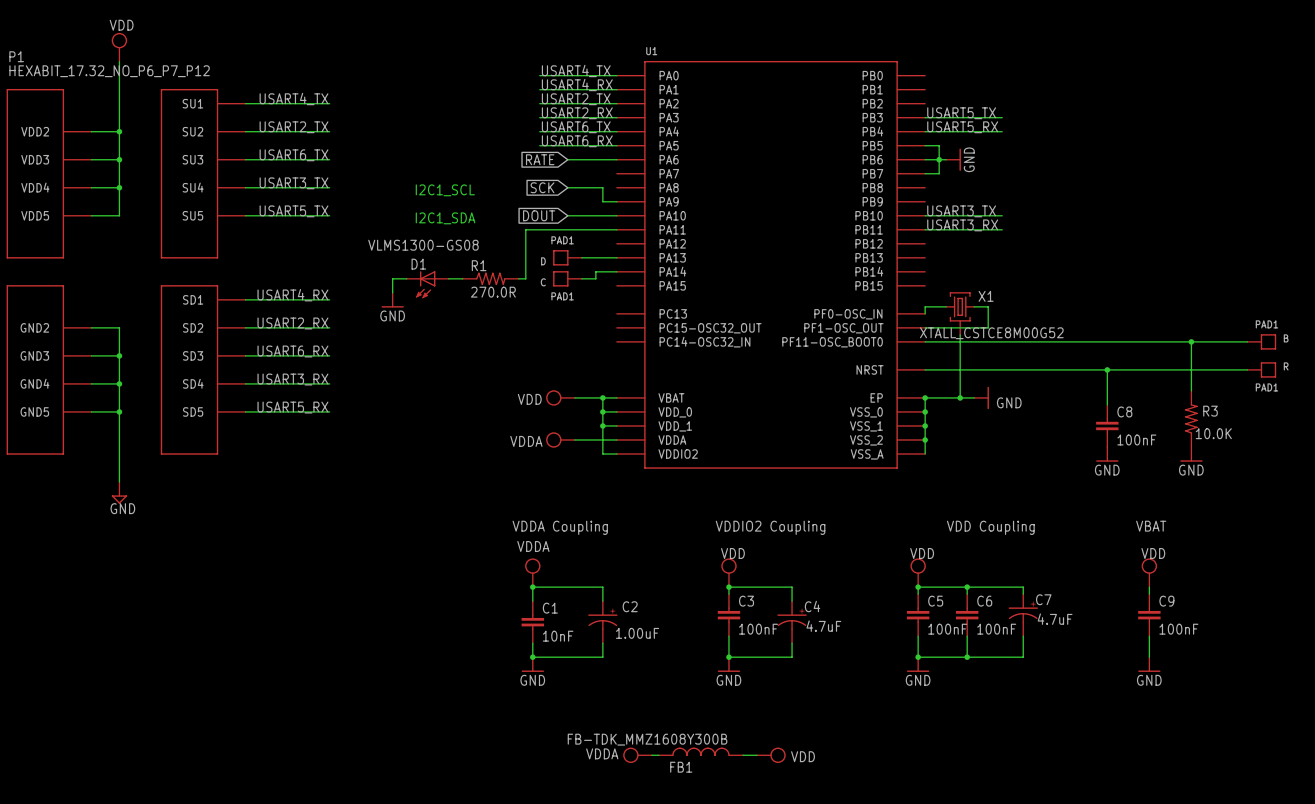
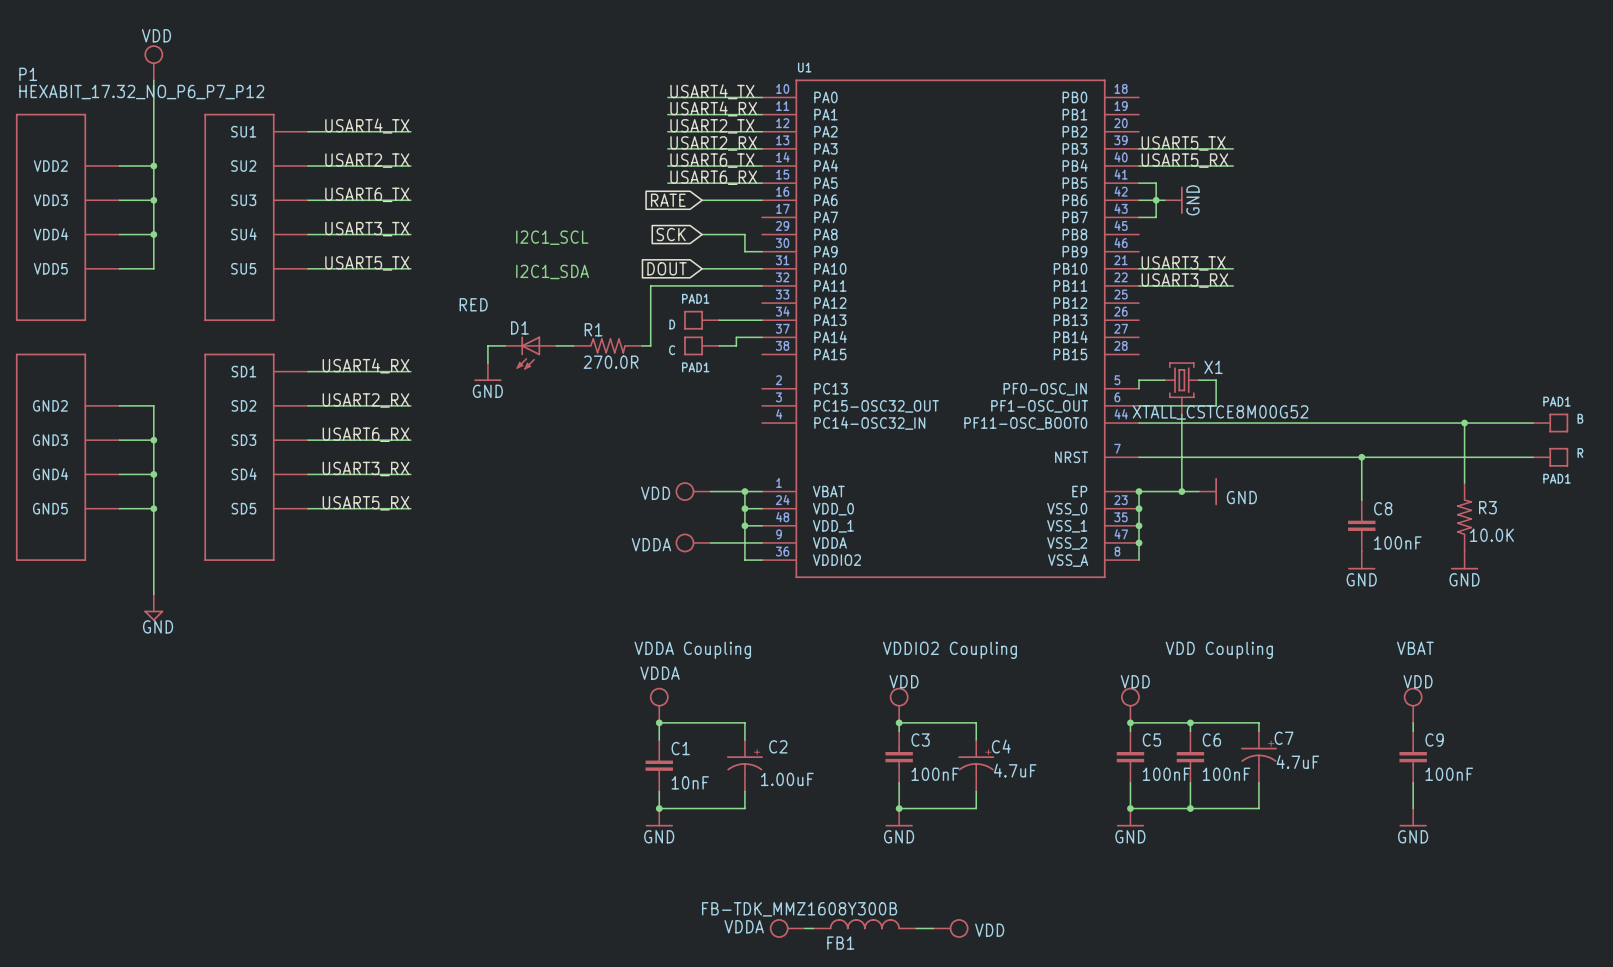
U1 symbol: [616, 60, 926, 469] -> [762, 79, 1140, 579]
D1 value: VLMS1300-GS08 (423, 245) -> RED (473, 304)

